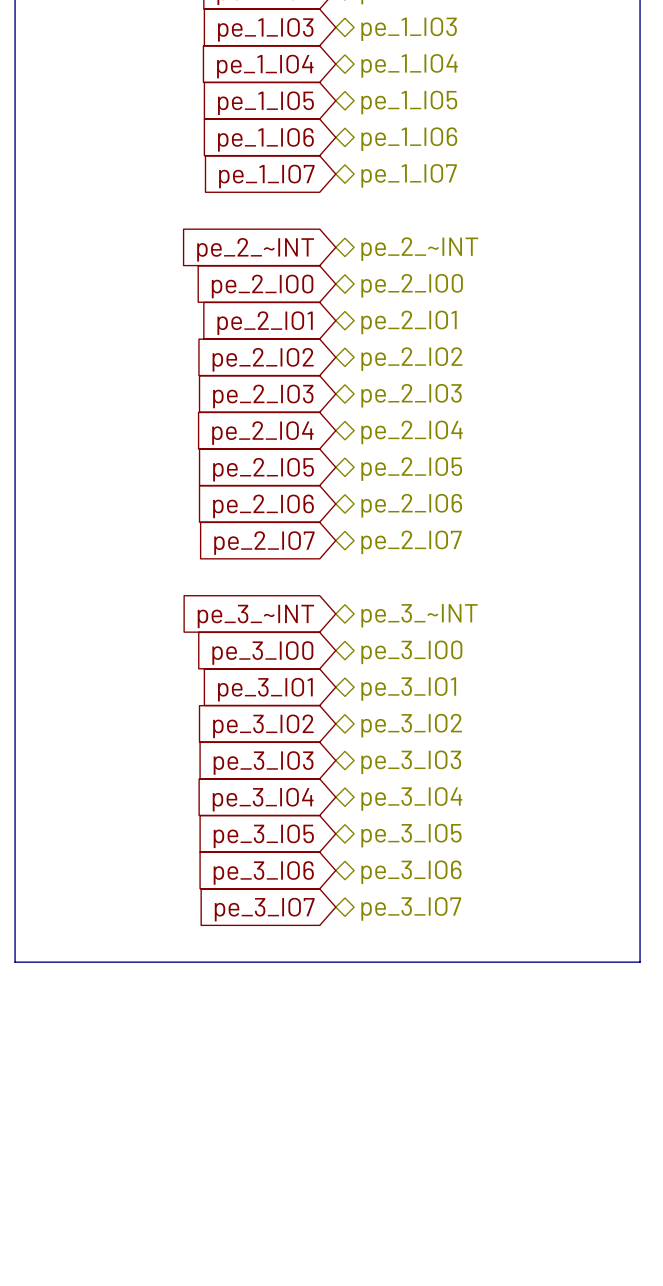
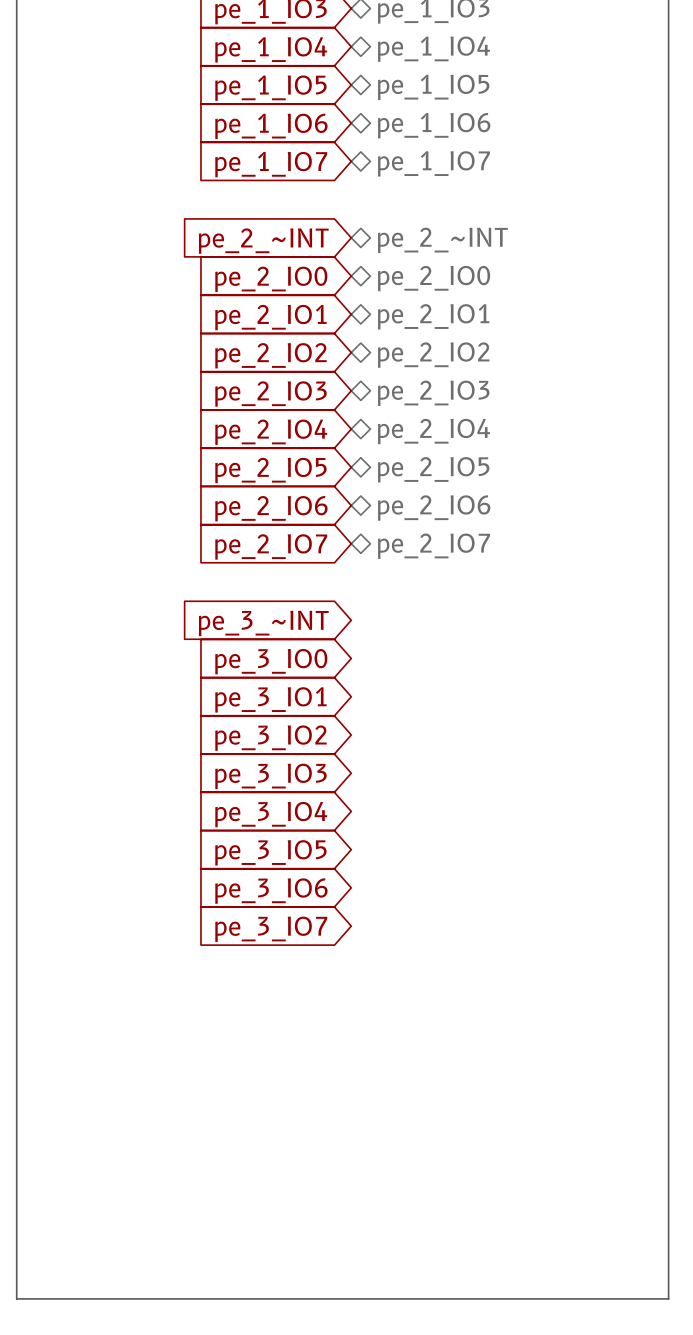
hierarchical label: pe_3_~INT (419, 615) -> none
hierarchical label: pe_3_IO0 (411, 652) -> none
hierarchical label: pe_3_IO1 (408, 688) -> none
hierarchical label: pe_3_IO2 (411, 725) -> none
hierarchical label: pe_3_IO3 (411, 762) -> none
hierarchical label: pe_3_IO4 (411, 798) -> none
hierarchical label: pe_3_IO5 (411, 835) -> none
hierarchical label: pe_3_IO6 (411, 872) -> none
hierarchical label: pe_3_IO7 (411, 908) -> none
line: (15, 962) (640, 962) -> (16, 983) (16, 1298) (668, 1298) (668, 983)

